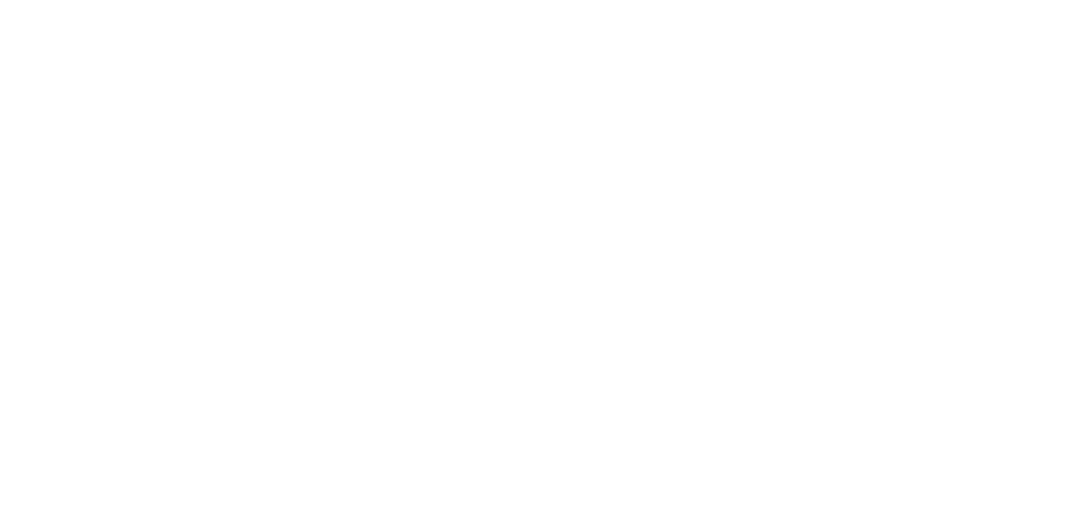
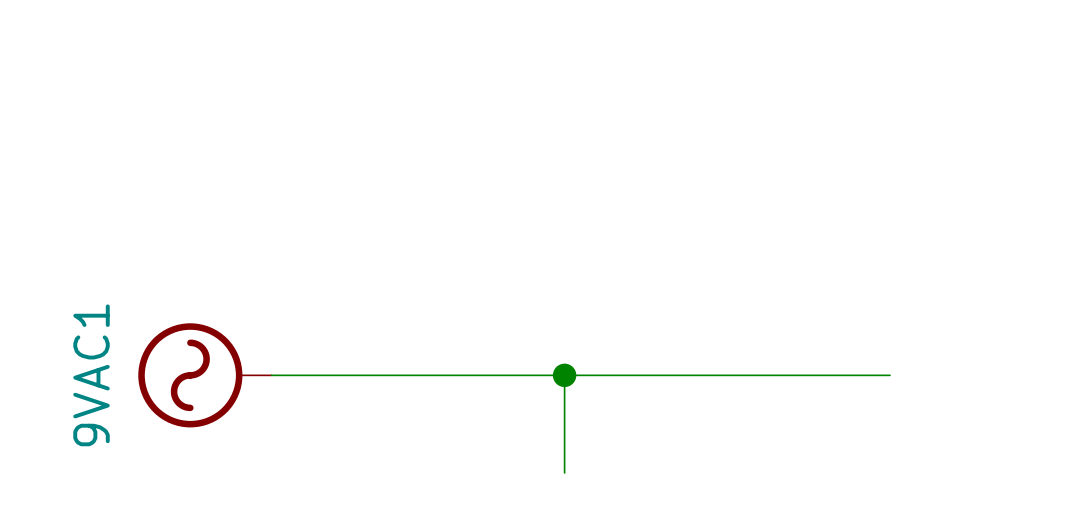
power symbol: none -> 9VAC1 (204, 375)
wire: none -> (271, 375) (890, 375)
wire: none -> (564, 375) (564, 472)
junction: none -> (564, 375)

